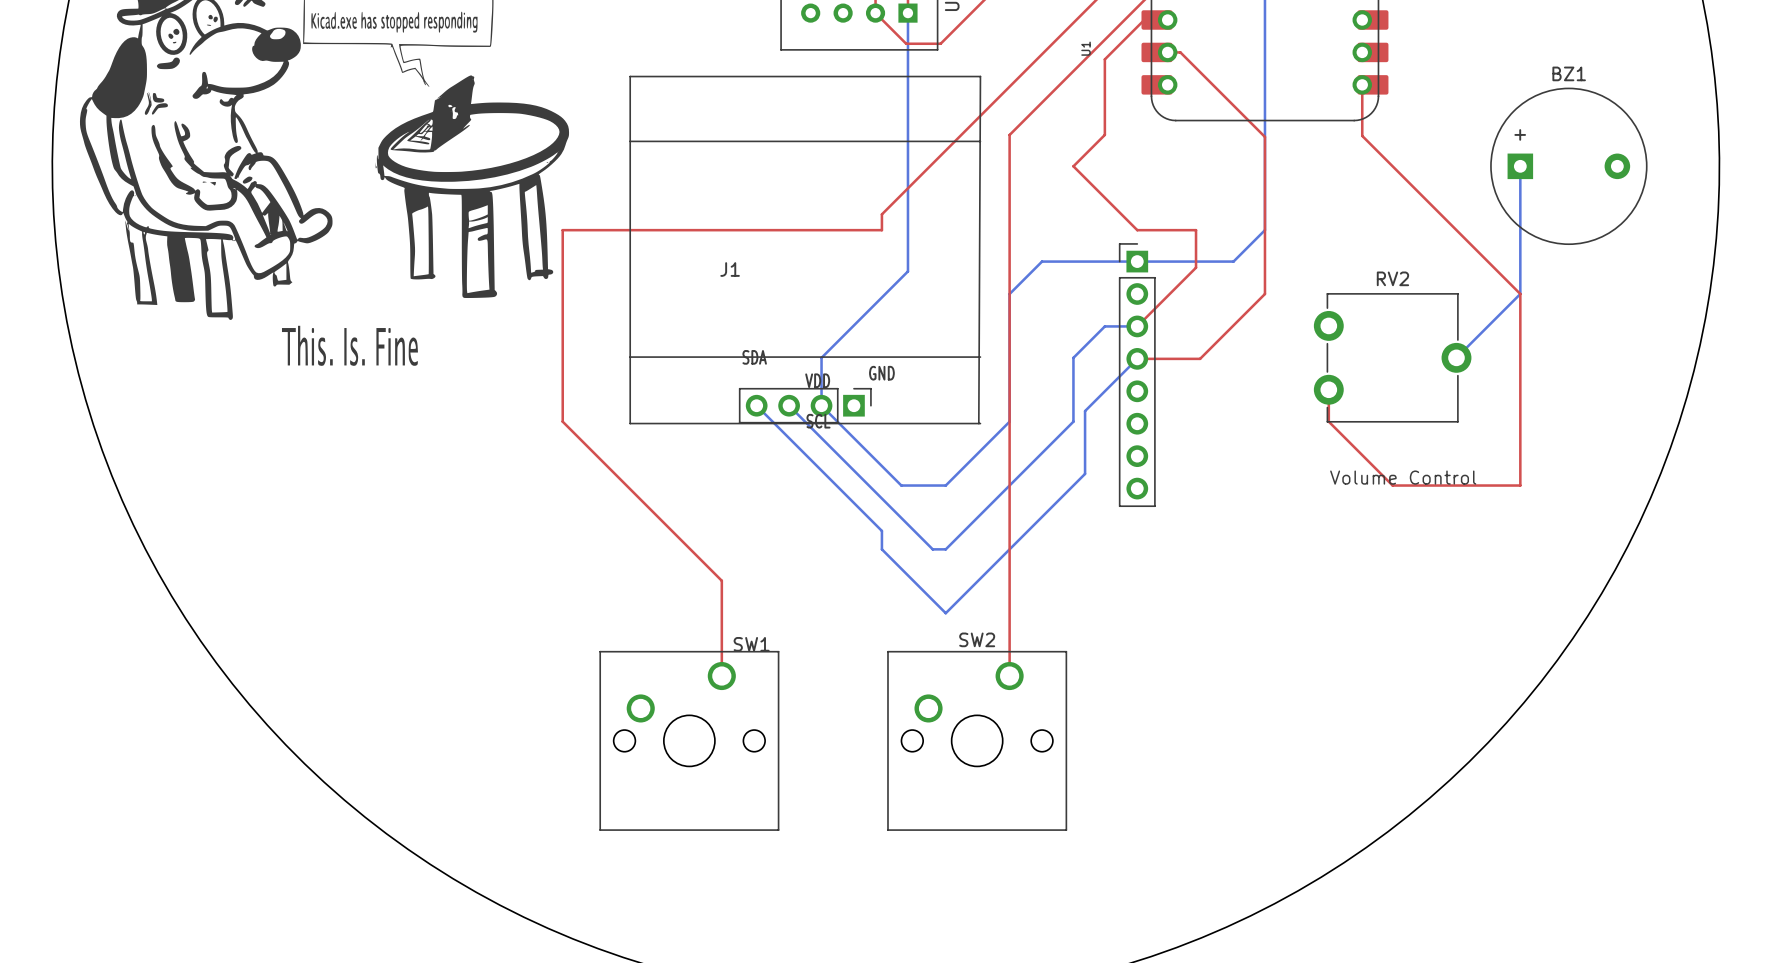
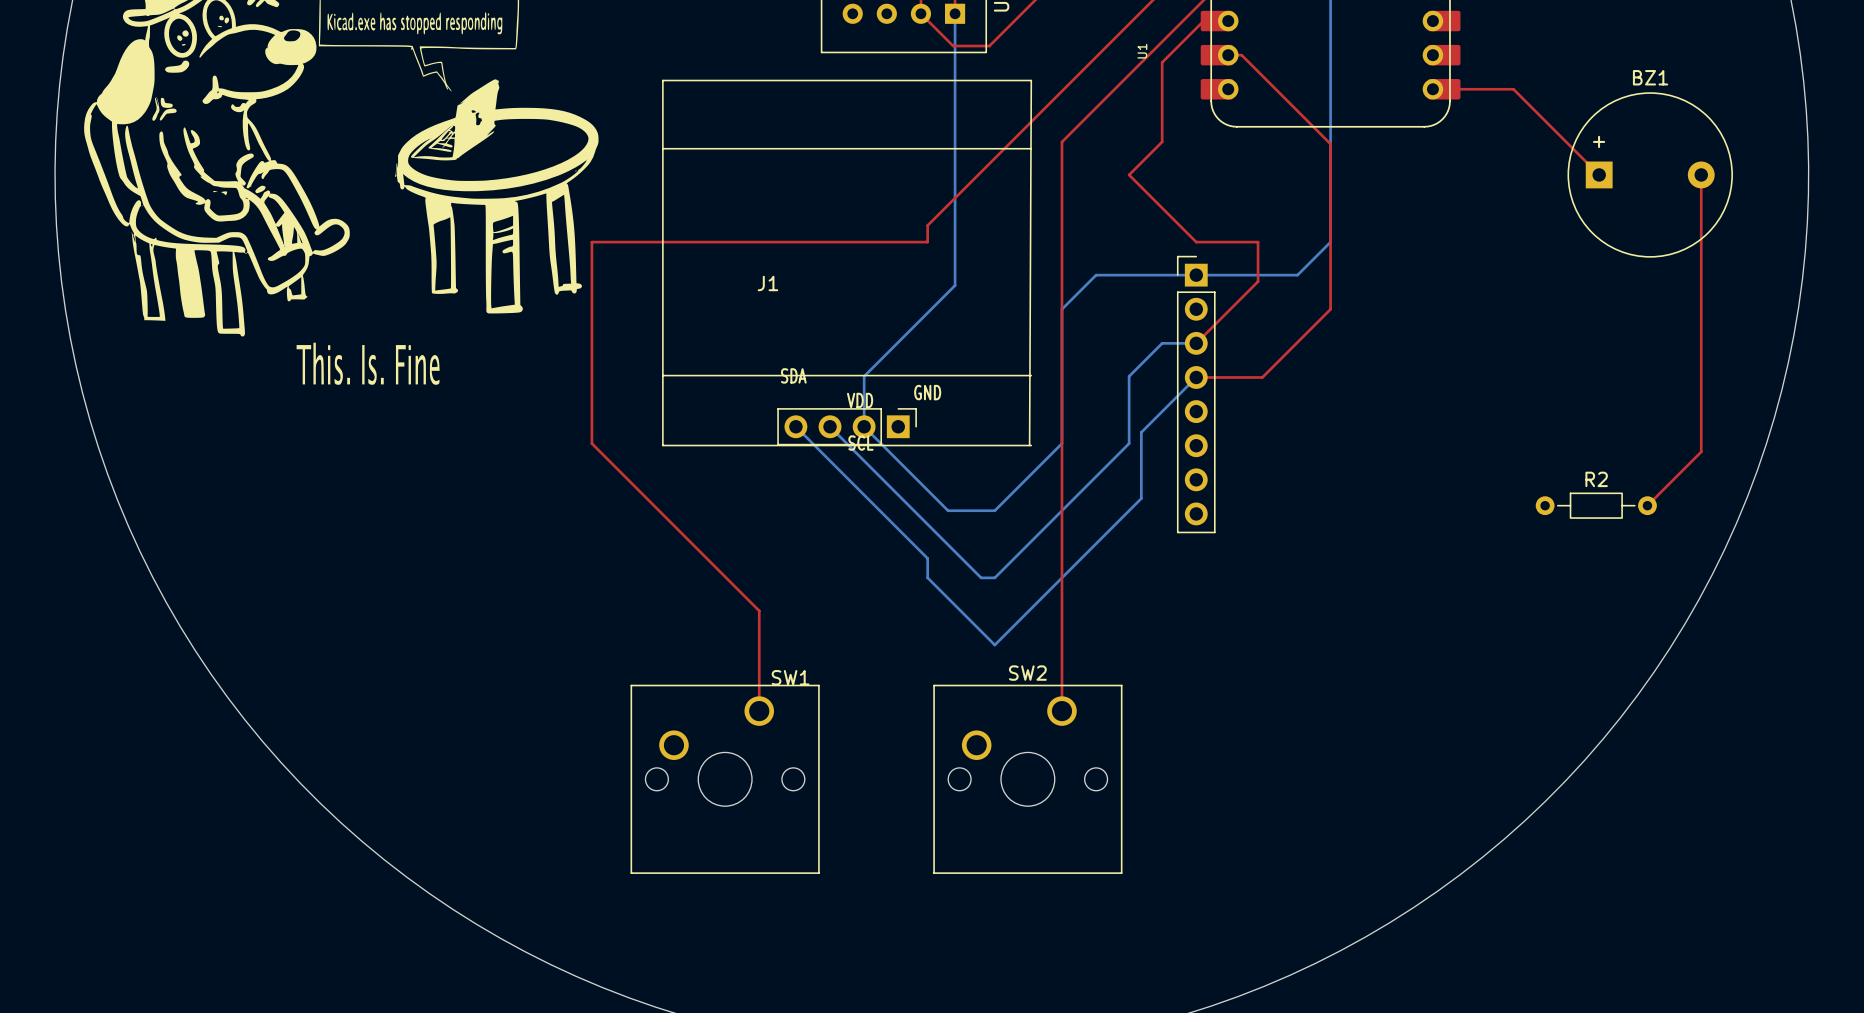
top track: (1362, 84) (1362, 135) (1520, 294) (1520, 485) (1392, 485) (1328, 421) (1328, 389) -> none
top track: none -> (1444, 89) (1513, 89) (1599, 174)
bottom track: (1520, 166) (1520, 294) (1456, 357) -> none
top track: none -> (1701, 174) (1701, 451) (1647, 505)
RV2: (1392, 357) -> none
text: Volume Control (1403, 477) -> none
R2: none -> (1596, 505)

